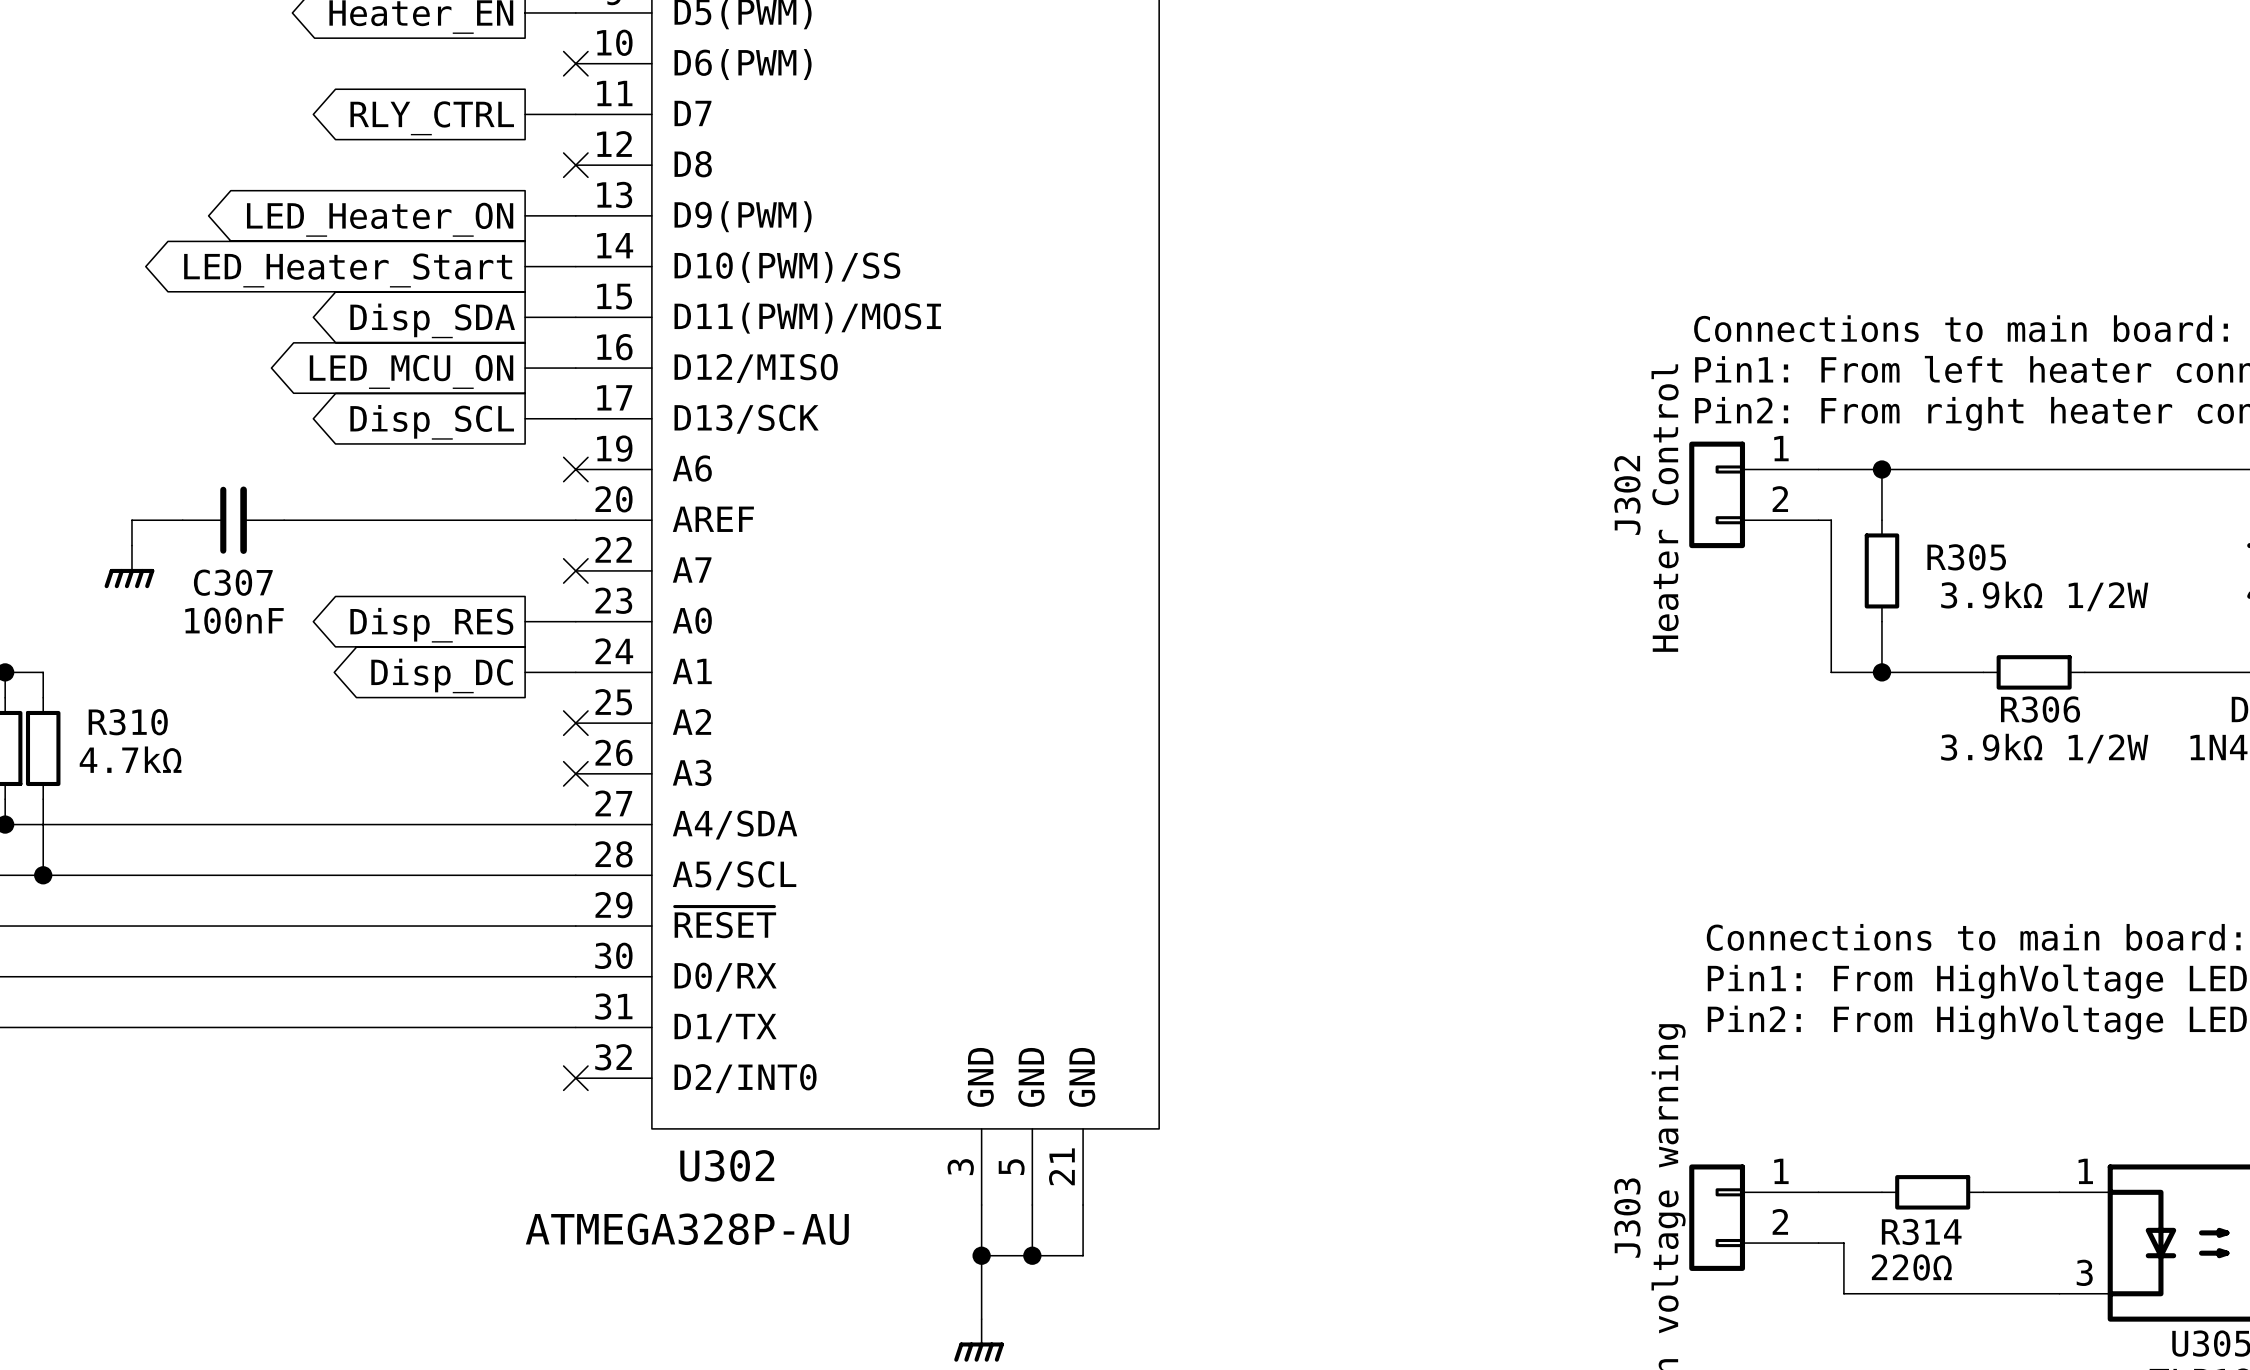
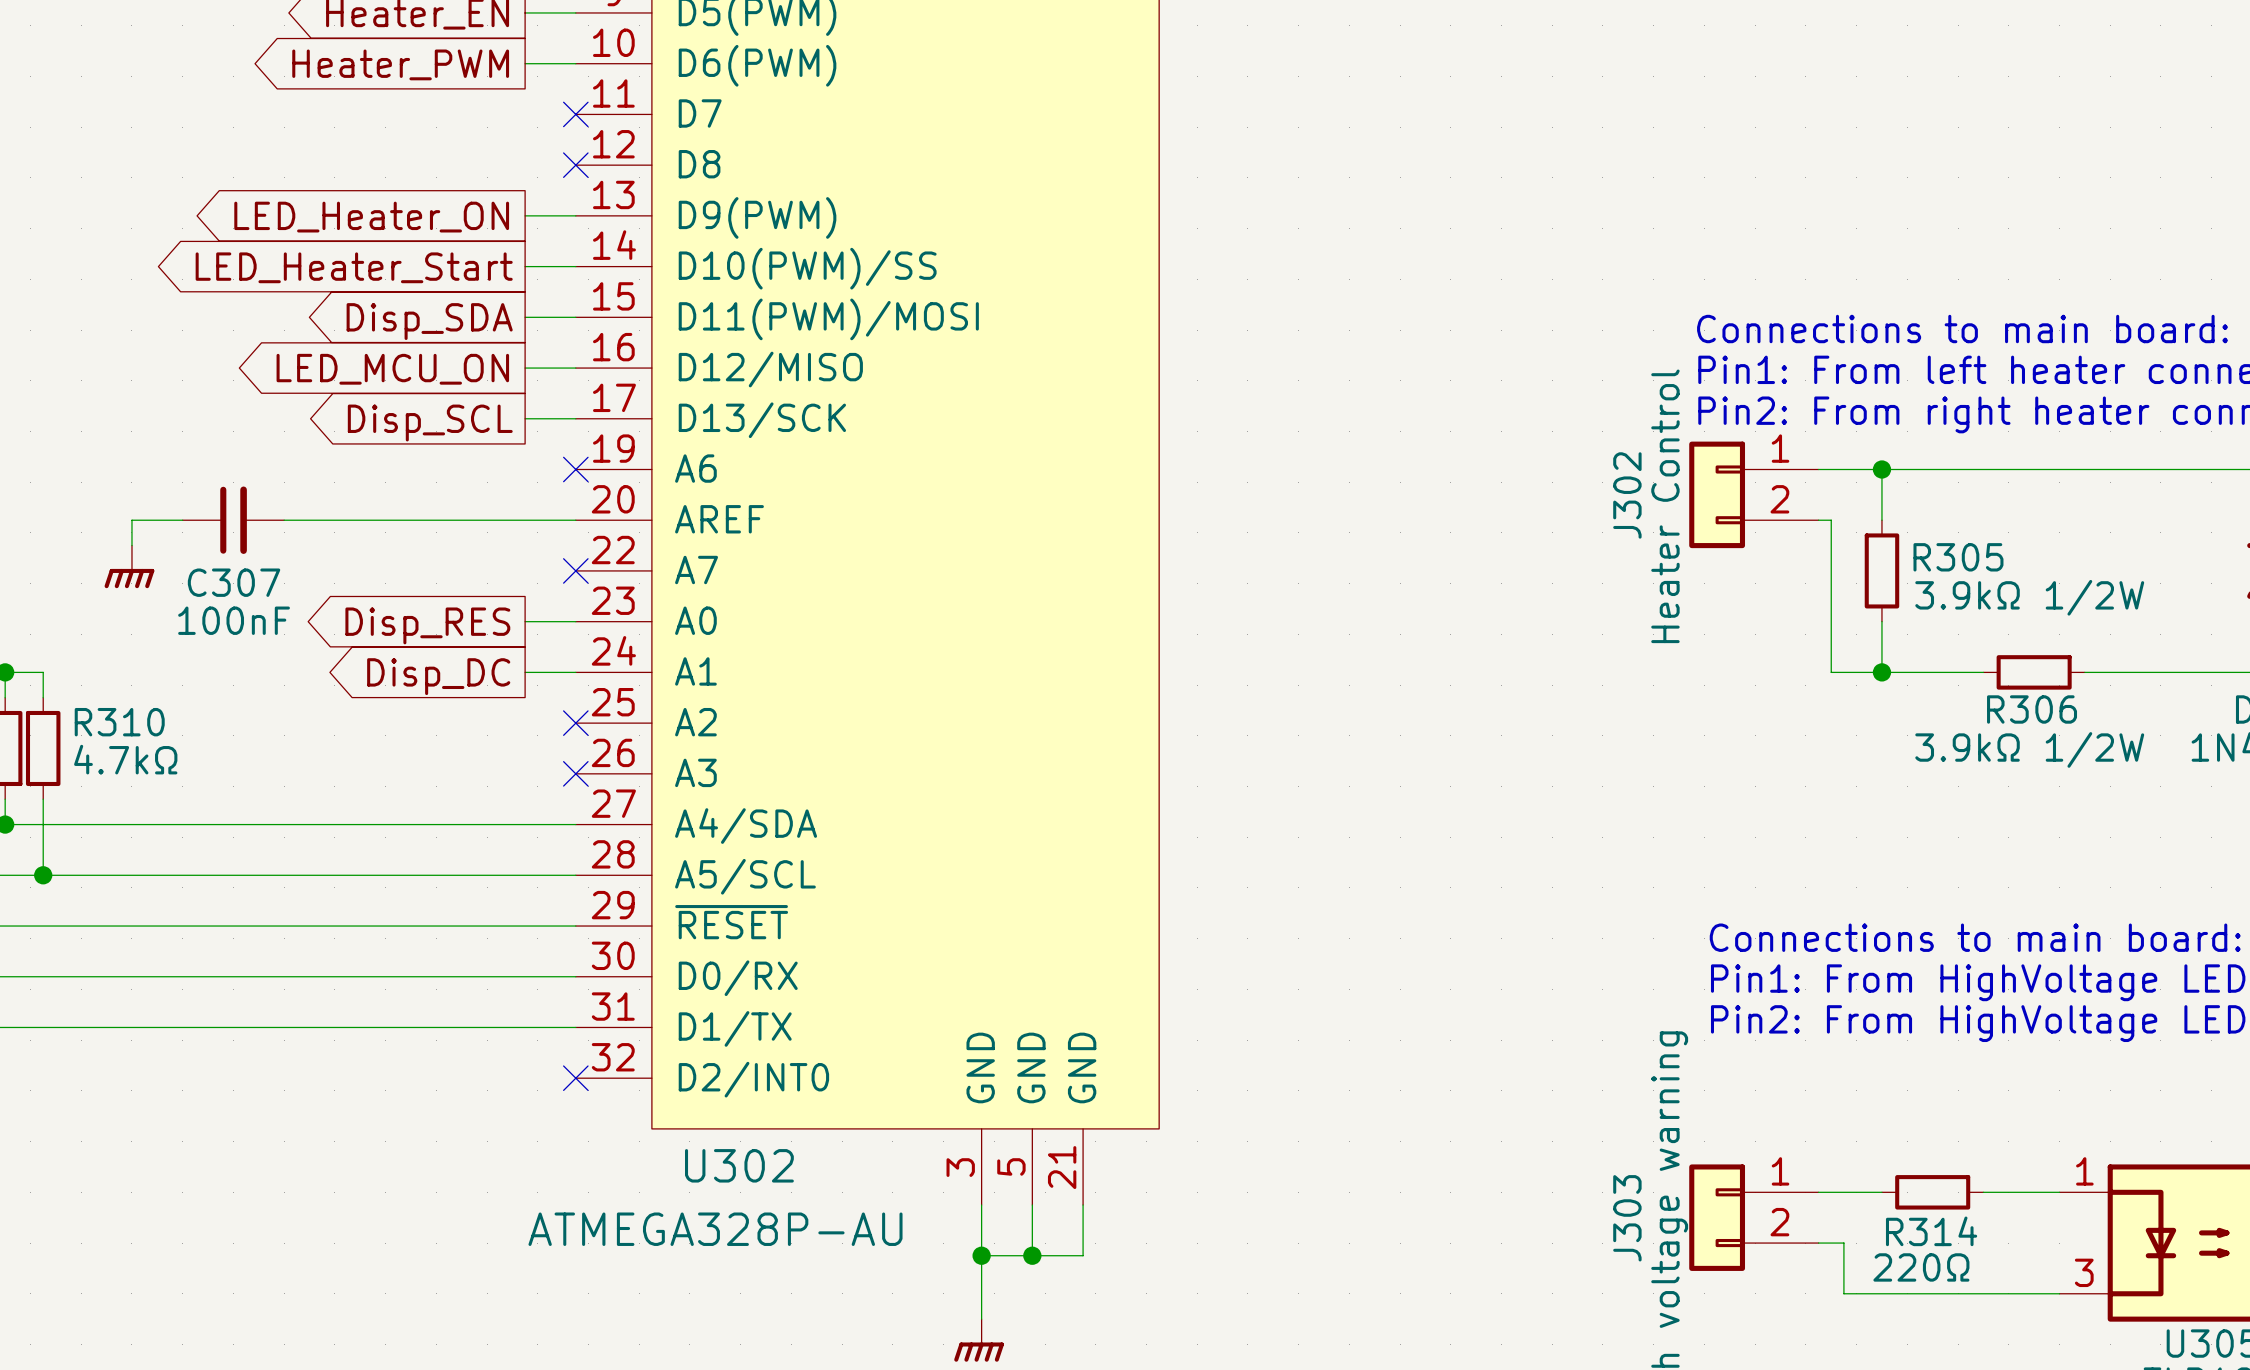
no-connect mark position: (575, 63) -> (575, 114)
global label: none -> Heater_PWM (400, 64)
wire: (525, 114) (575, 114) -> (525, 63) (575, 63)
global label: RLY_CTRL (432, 118) -> none

